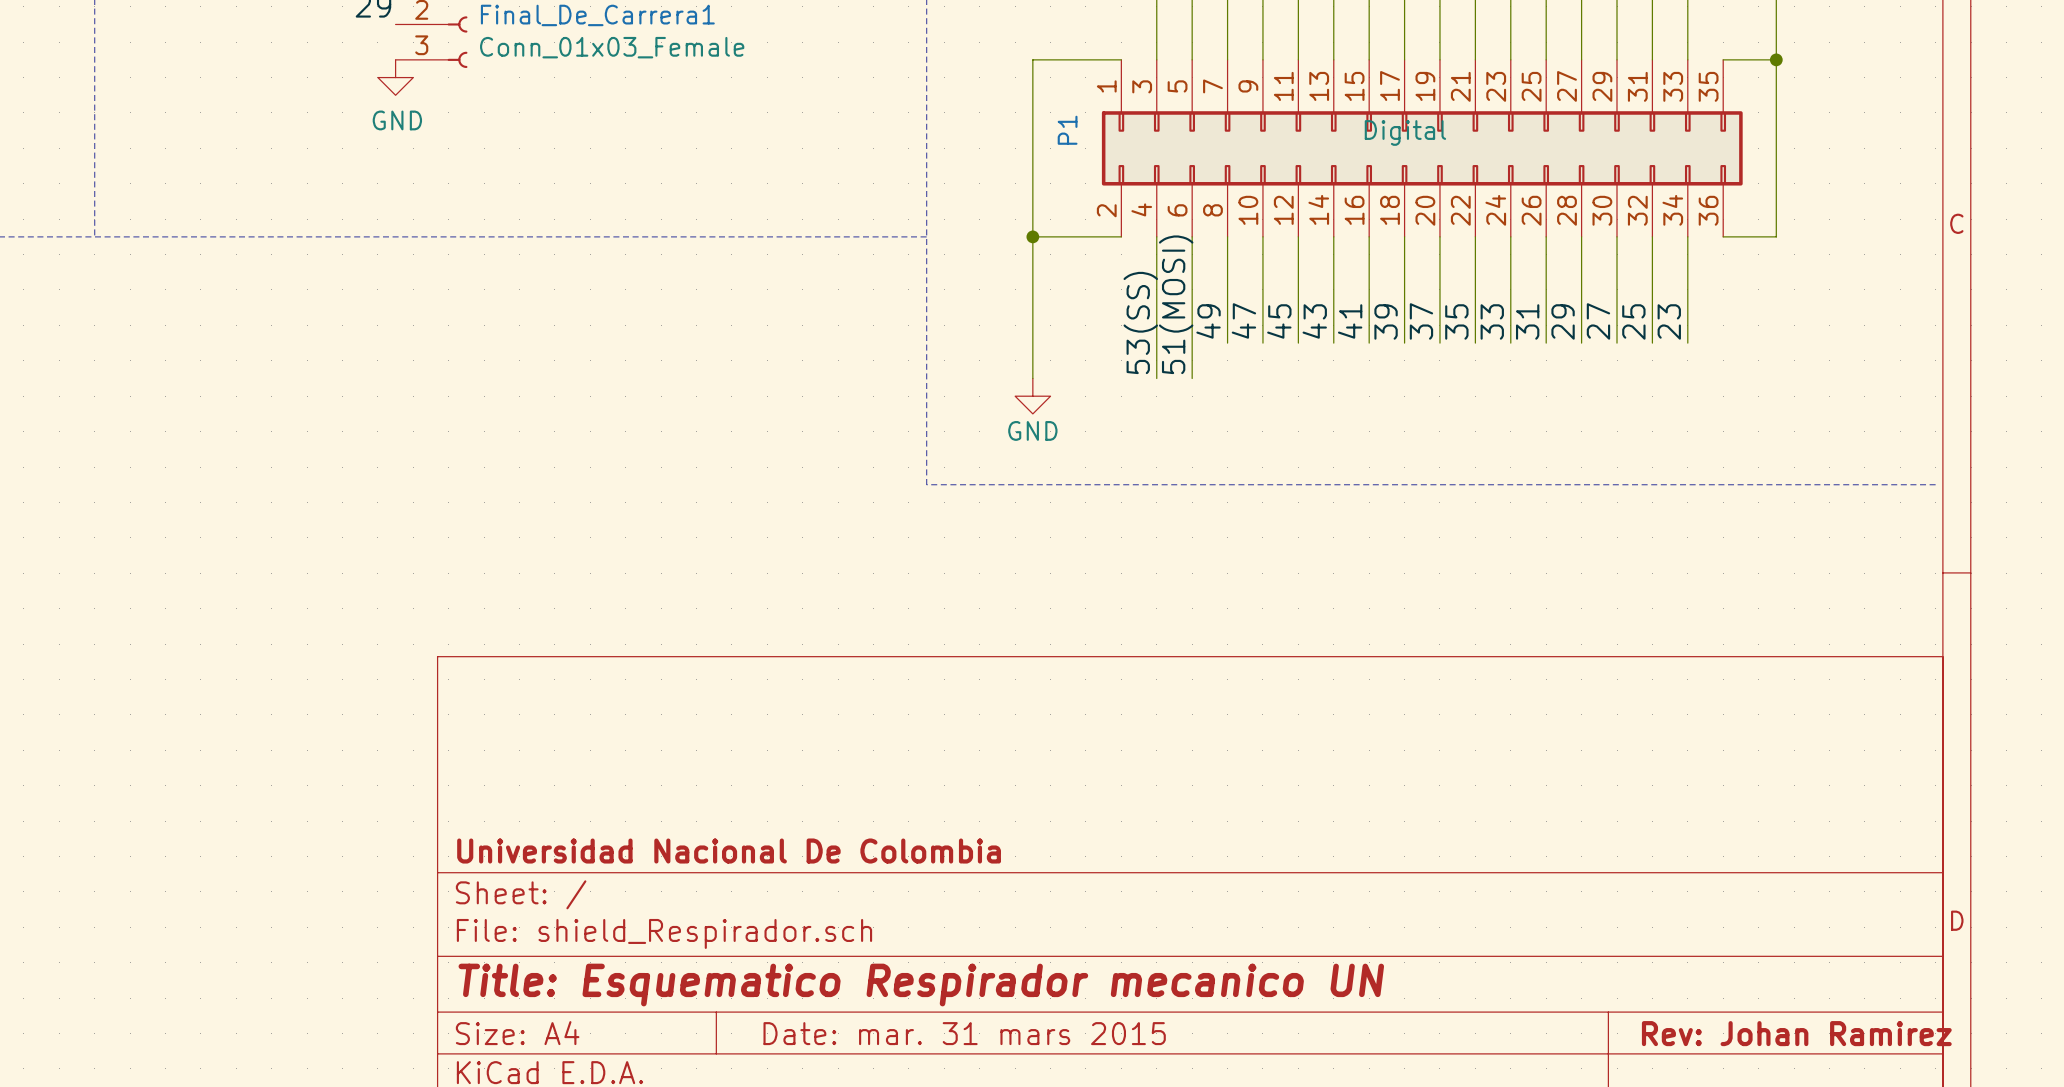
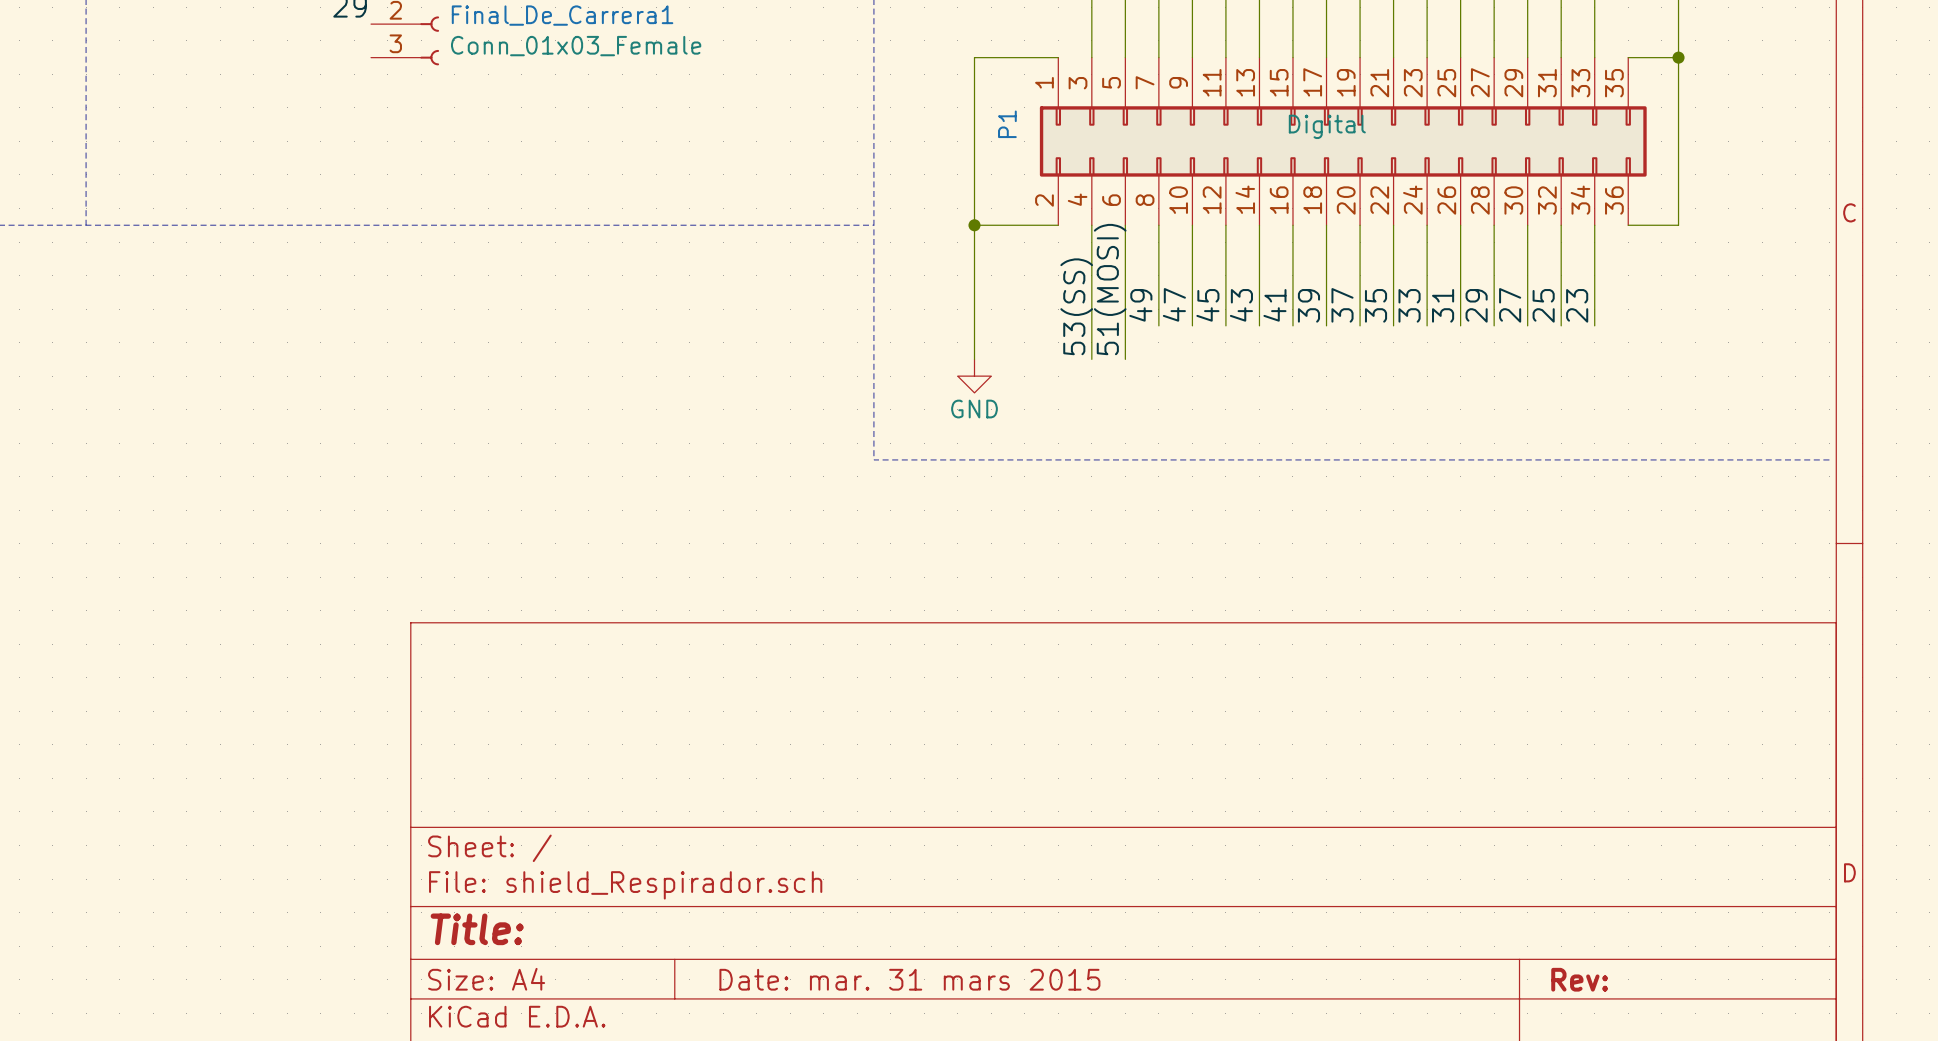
power symbol: GND (395, 77) -> none
title block: Universidad Nacional De Colombia (729, 851) -> none
title block: Title: Esquematico Respirador mecanico UN (921, 985) -> Title: (477, 929)
title block: Rev: Johan Ramirez (1796, 1033) -> Rev: (1579, 979)

